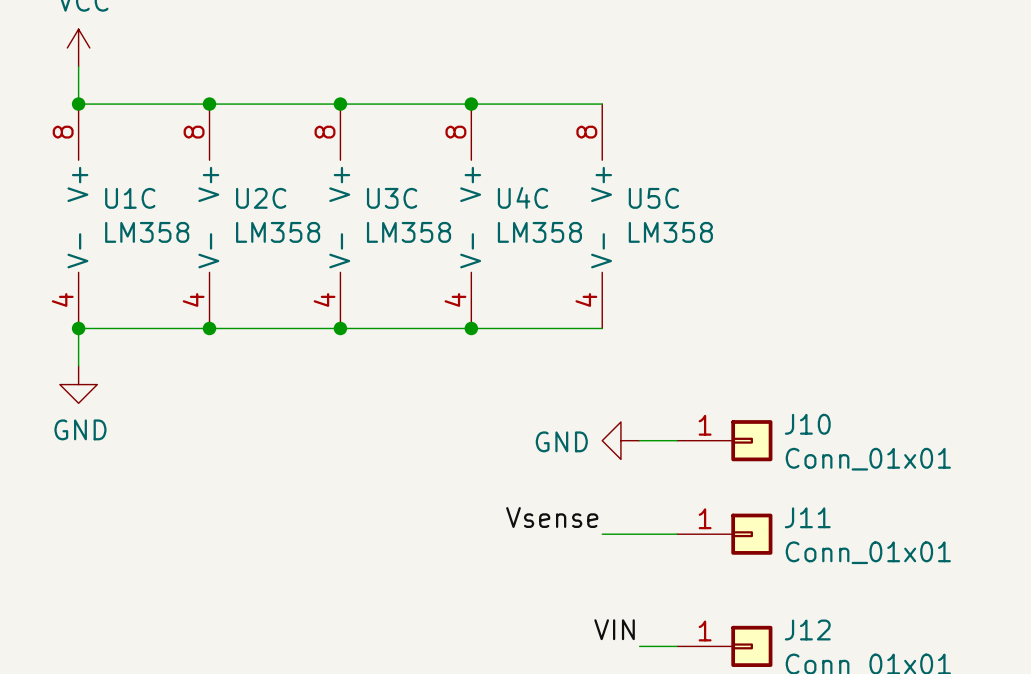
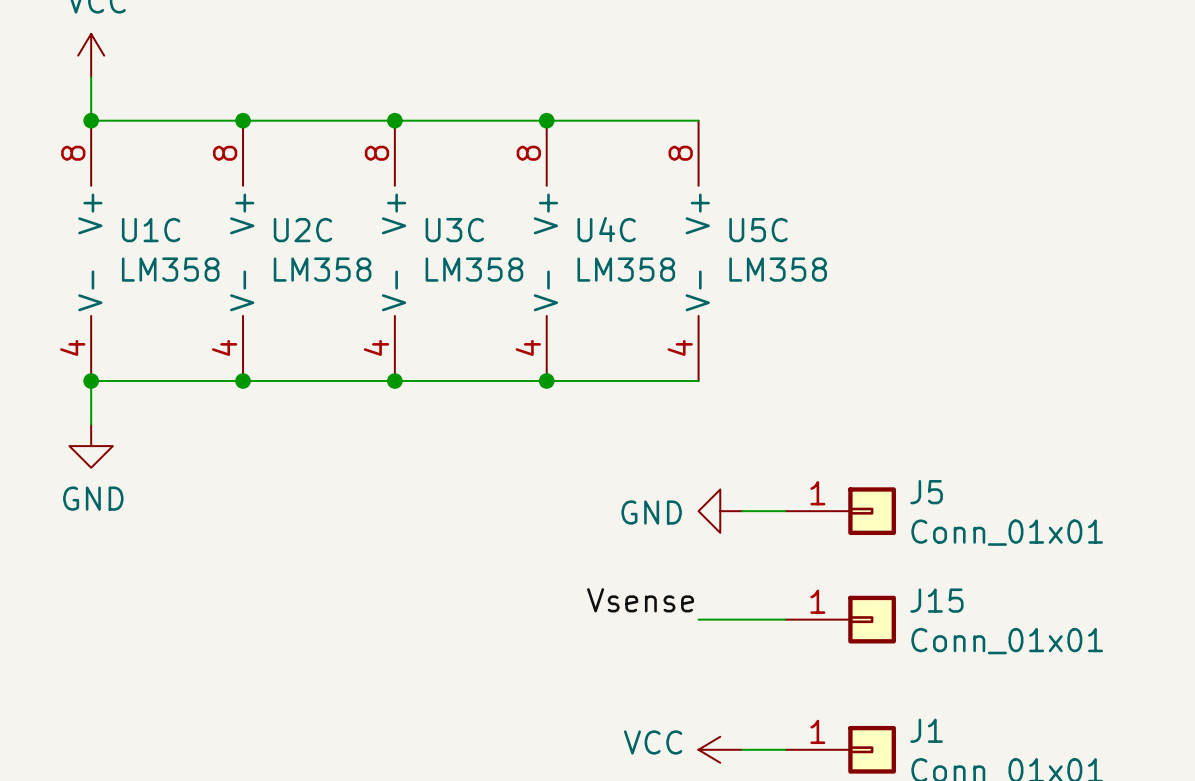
J10 name: J10 (807, 424) -> J5 (926, 492)
J11 name: J11 (807, 517) -> J15 (936, 600)
label: VIN (614, 629) -> none
J12 name: J12 (807, 630) -> J1 (926, 730)
power symbol: none -> VCC (720, 749)

